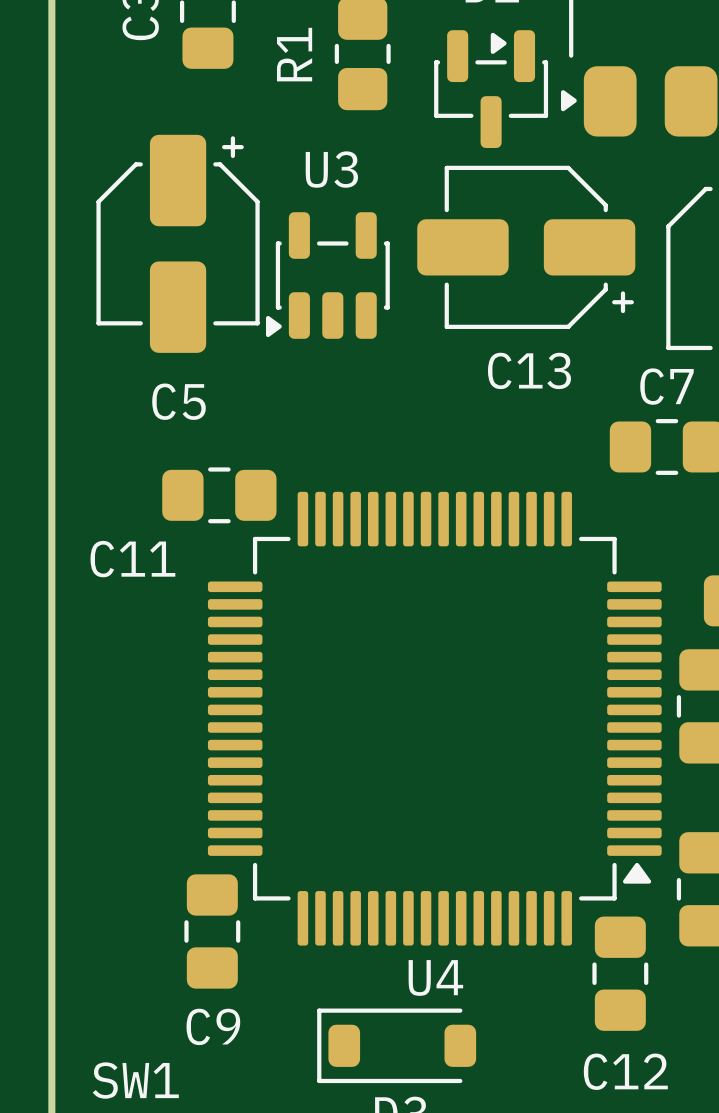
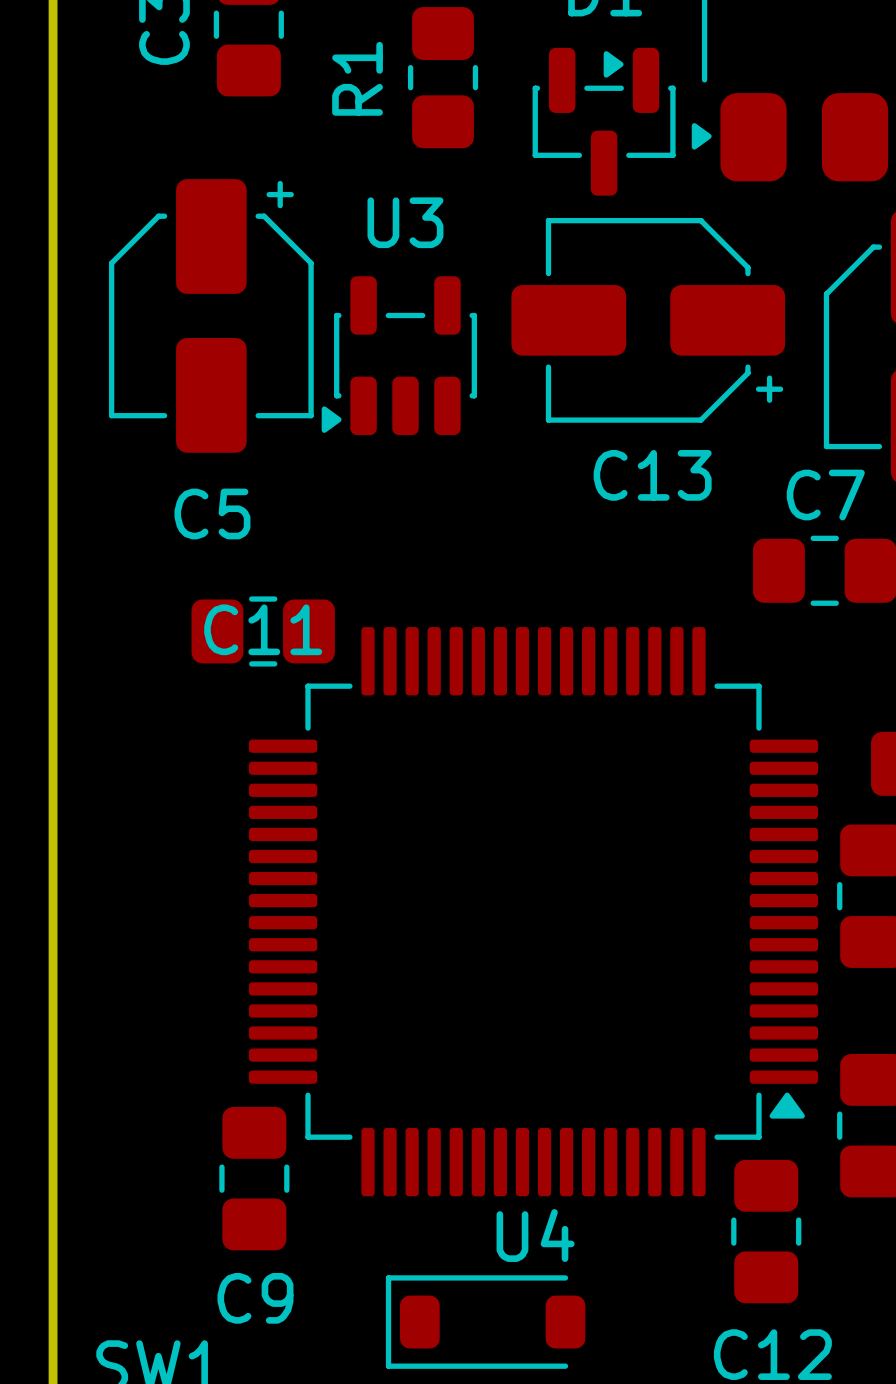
C11 name position: C11 (132, 559) -> C11 (263, 629)

